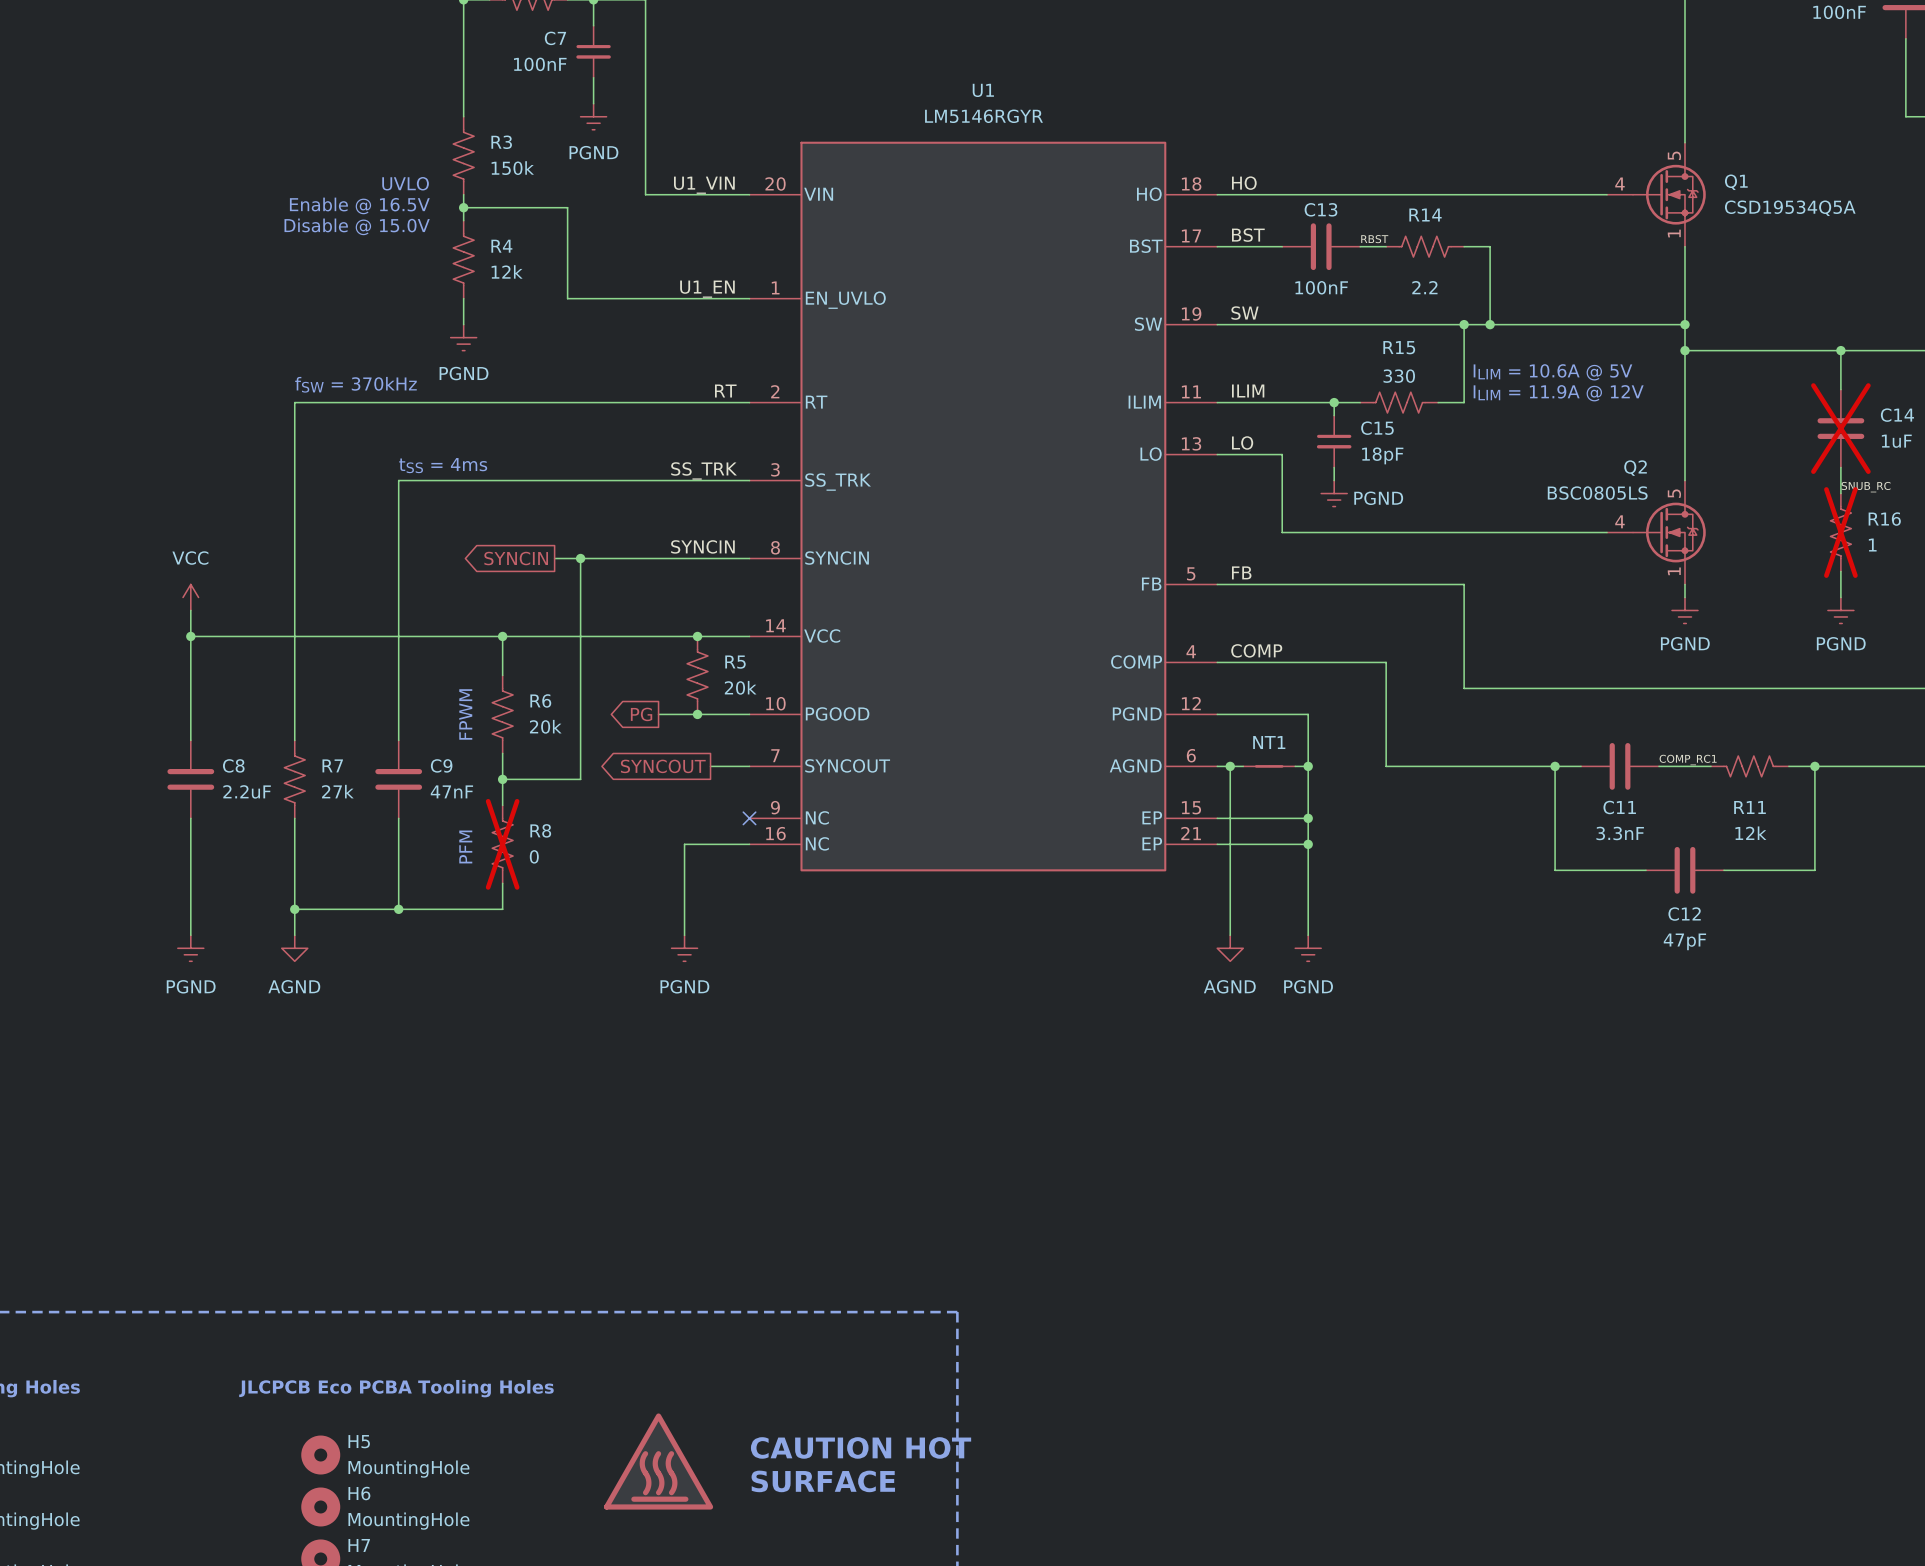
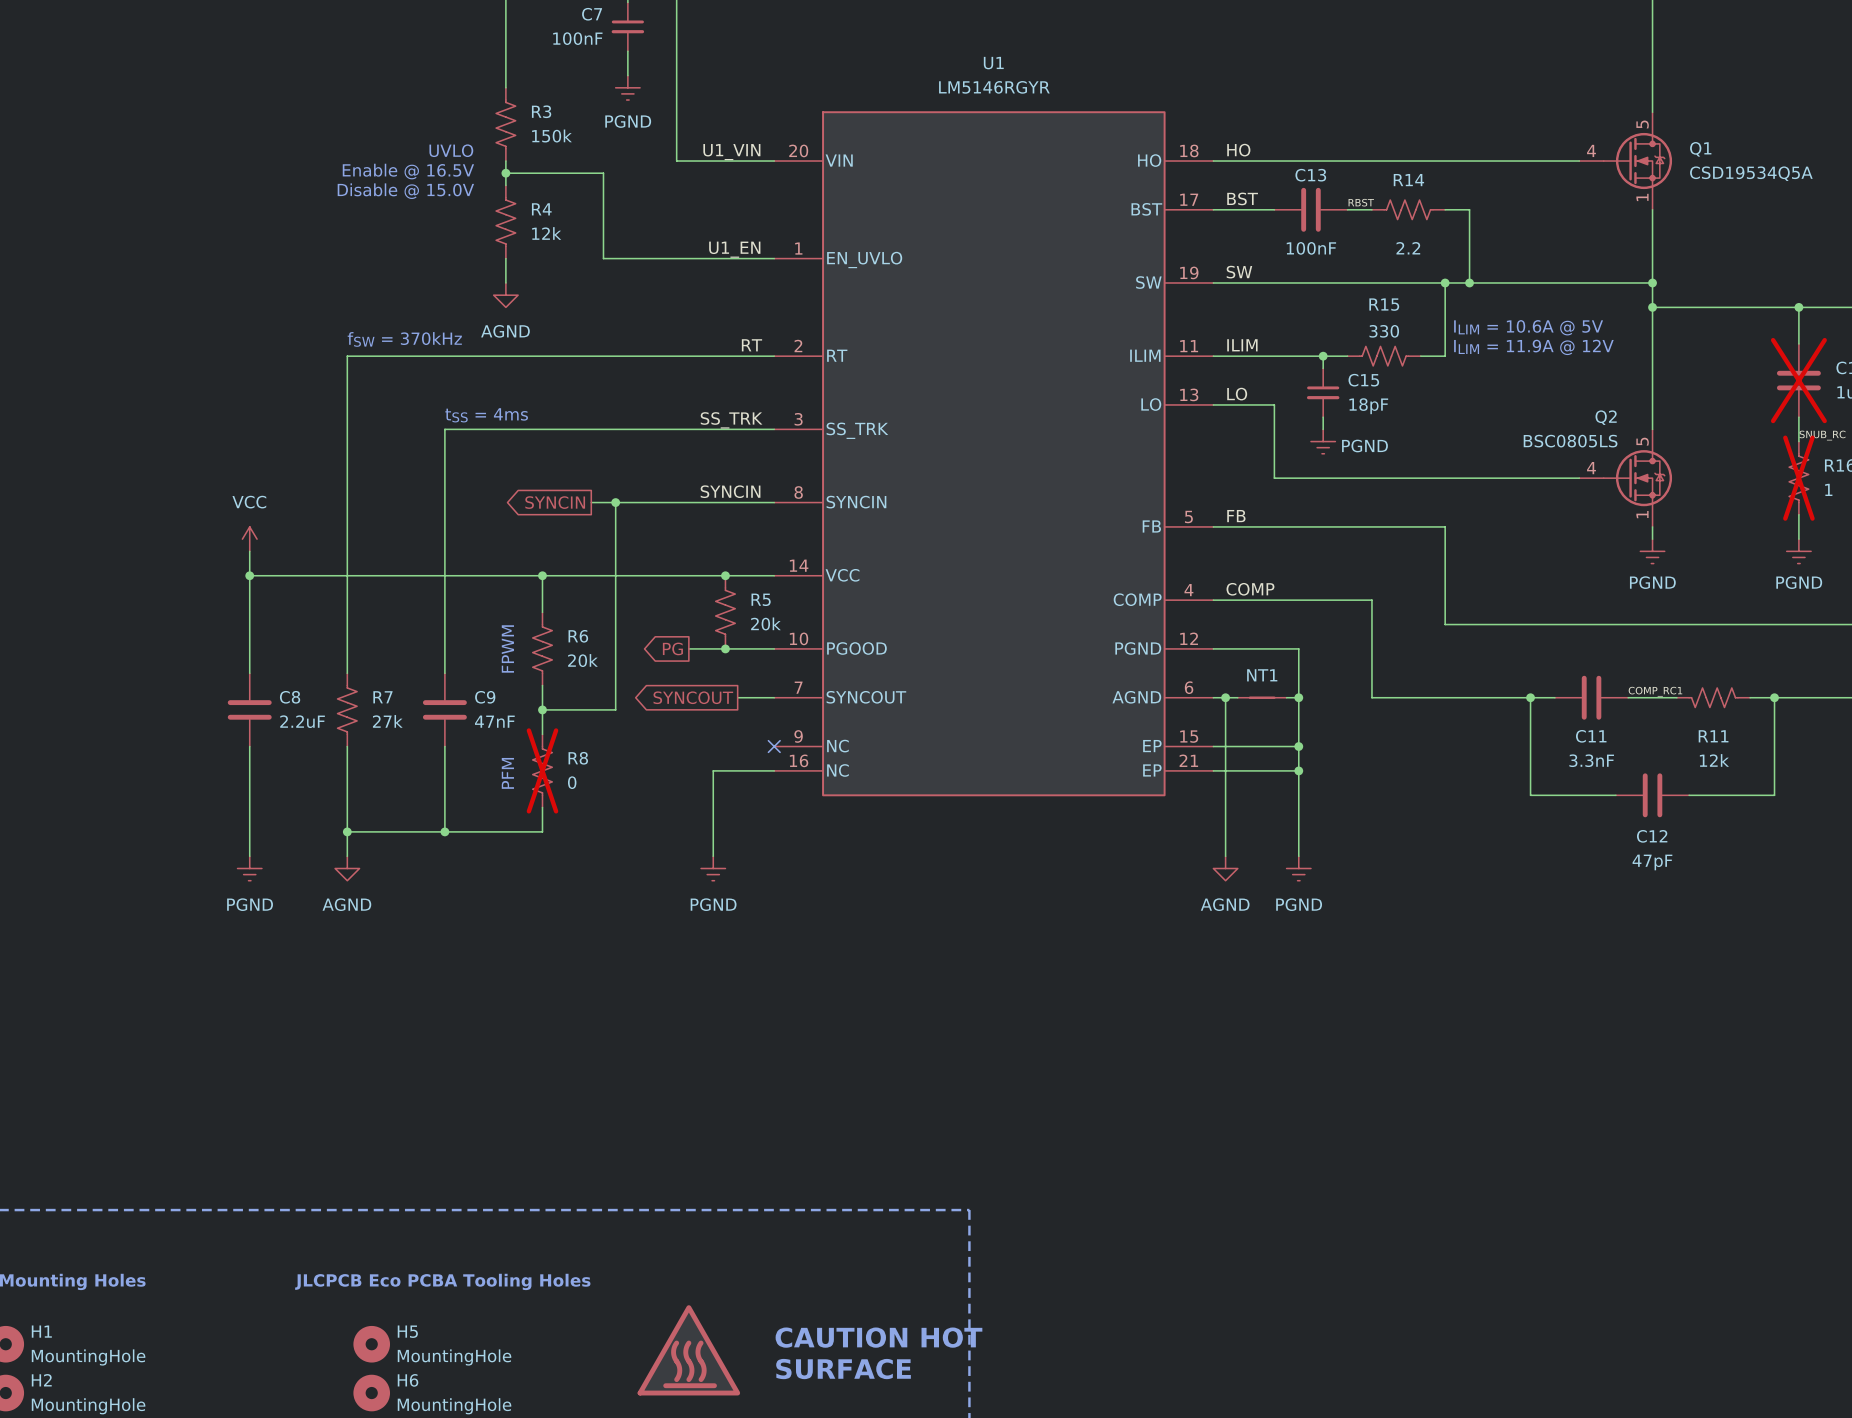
power symbol: PGND (463, 337) -> AGND (505, 295)

